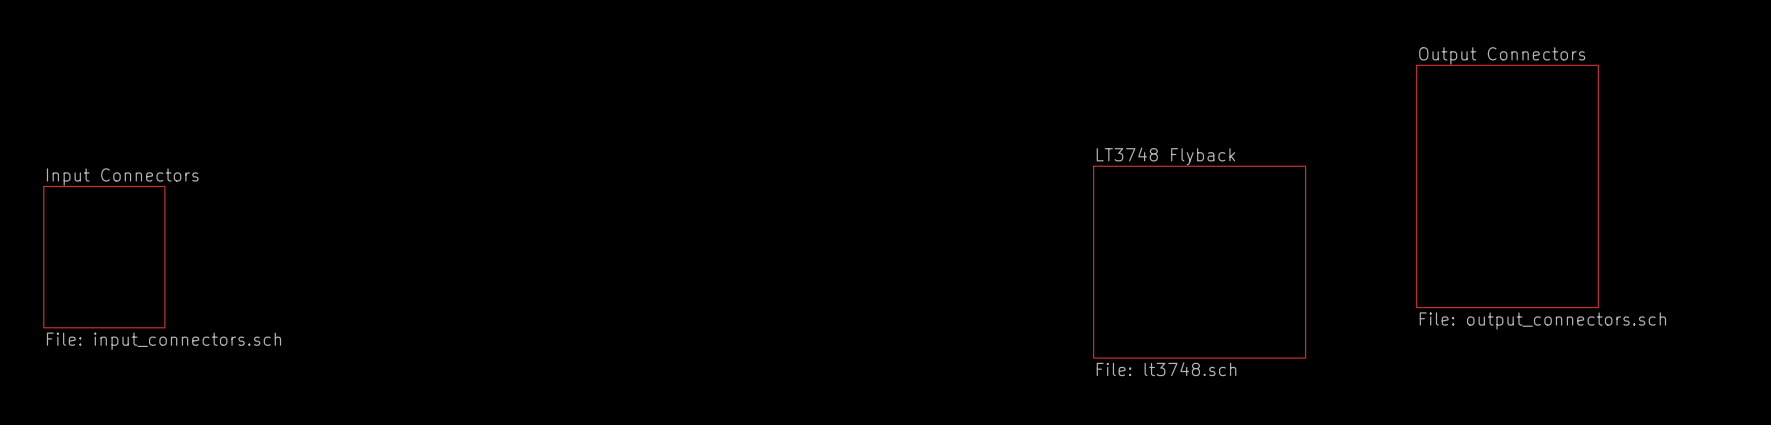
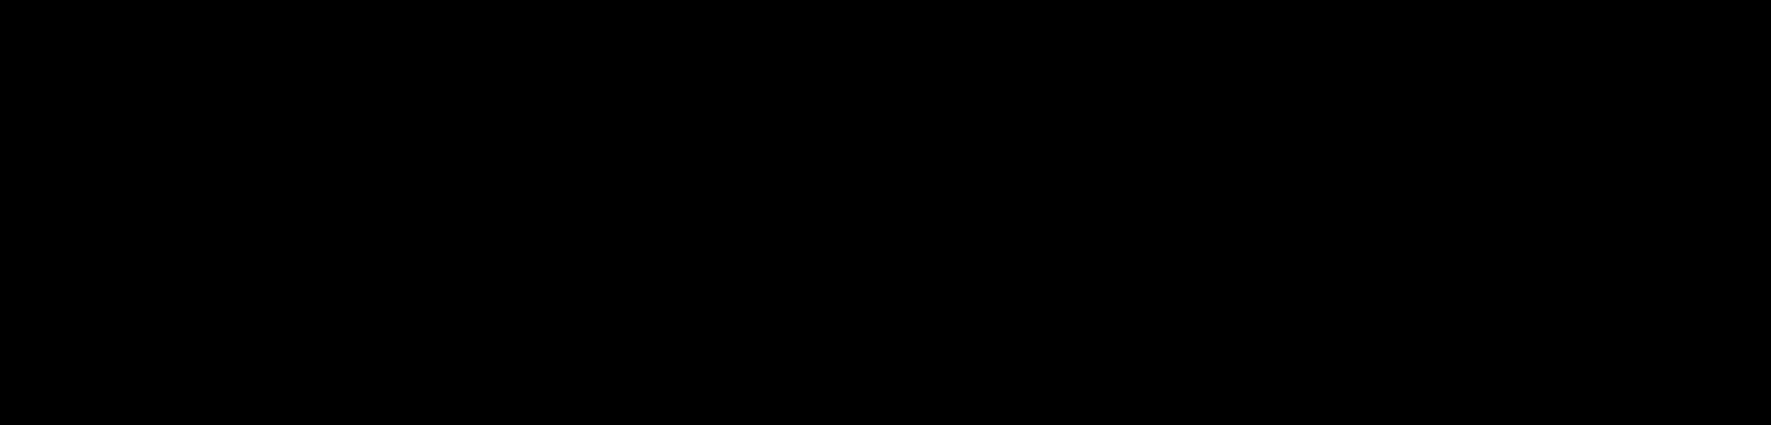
sheet Output Connectors: File: output_connectors.sch (1507, 186) -> none
sheet Input Connectors: File: input_connectors.sch (104, 257) -> none
sheet LT3748 Flyback: File: lt3748.sch (1199, 262) -> none

